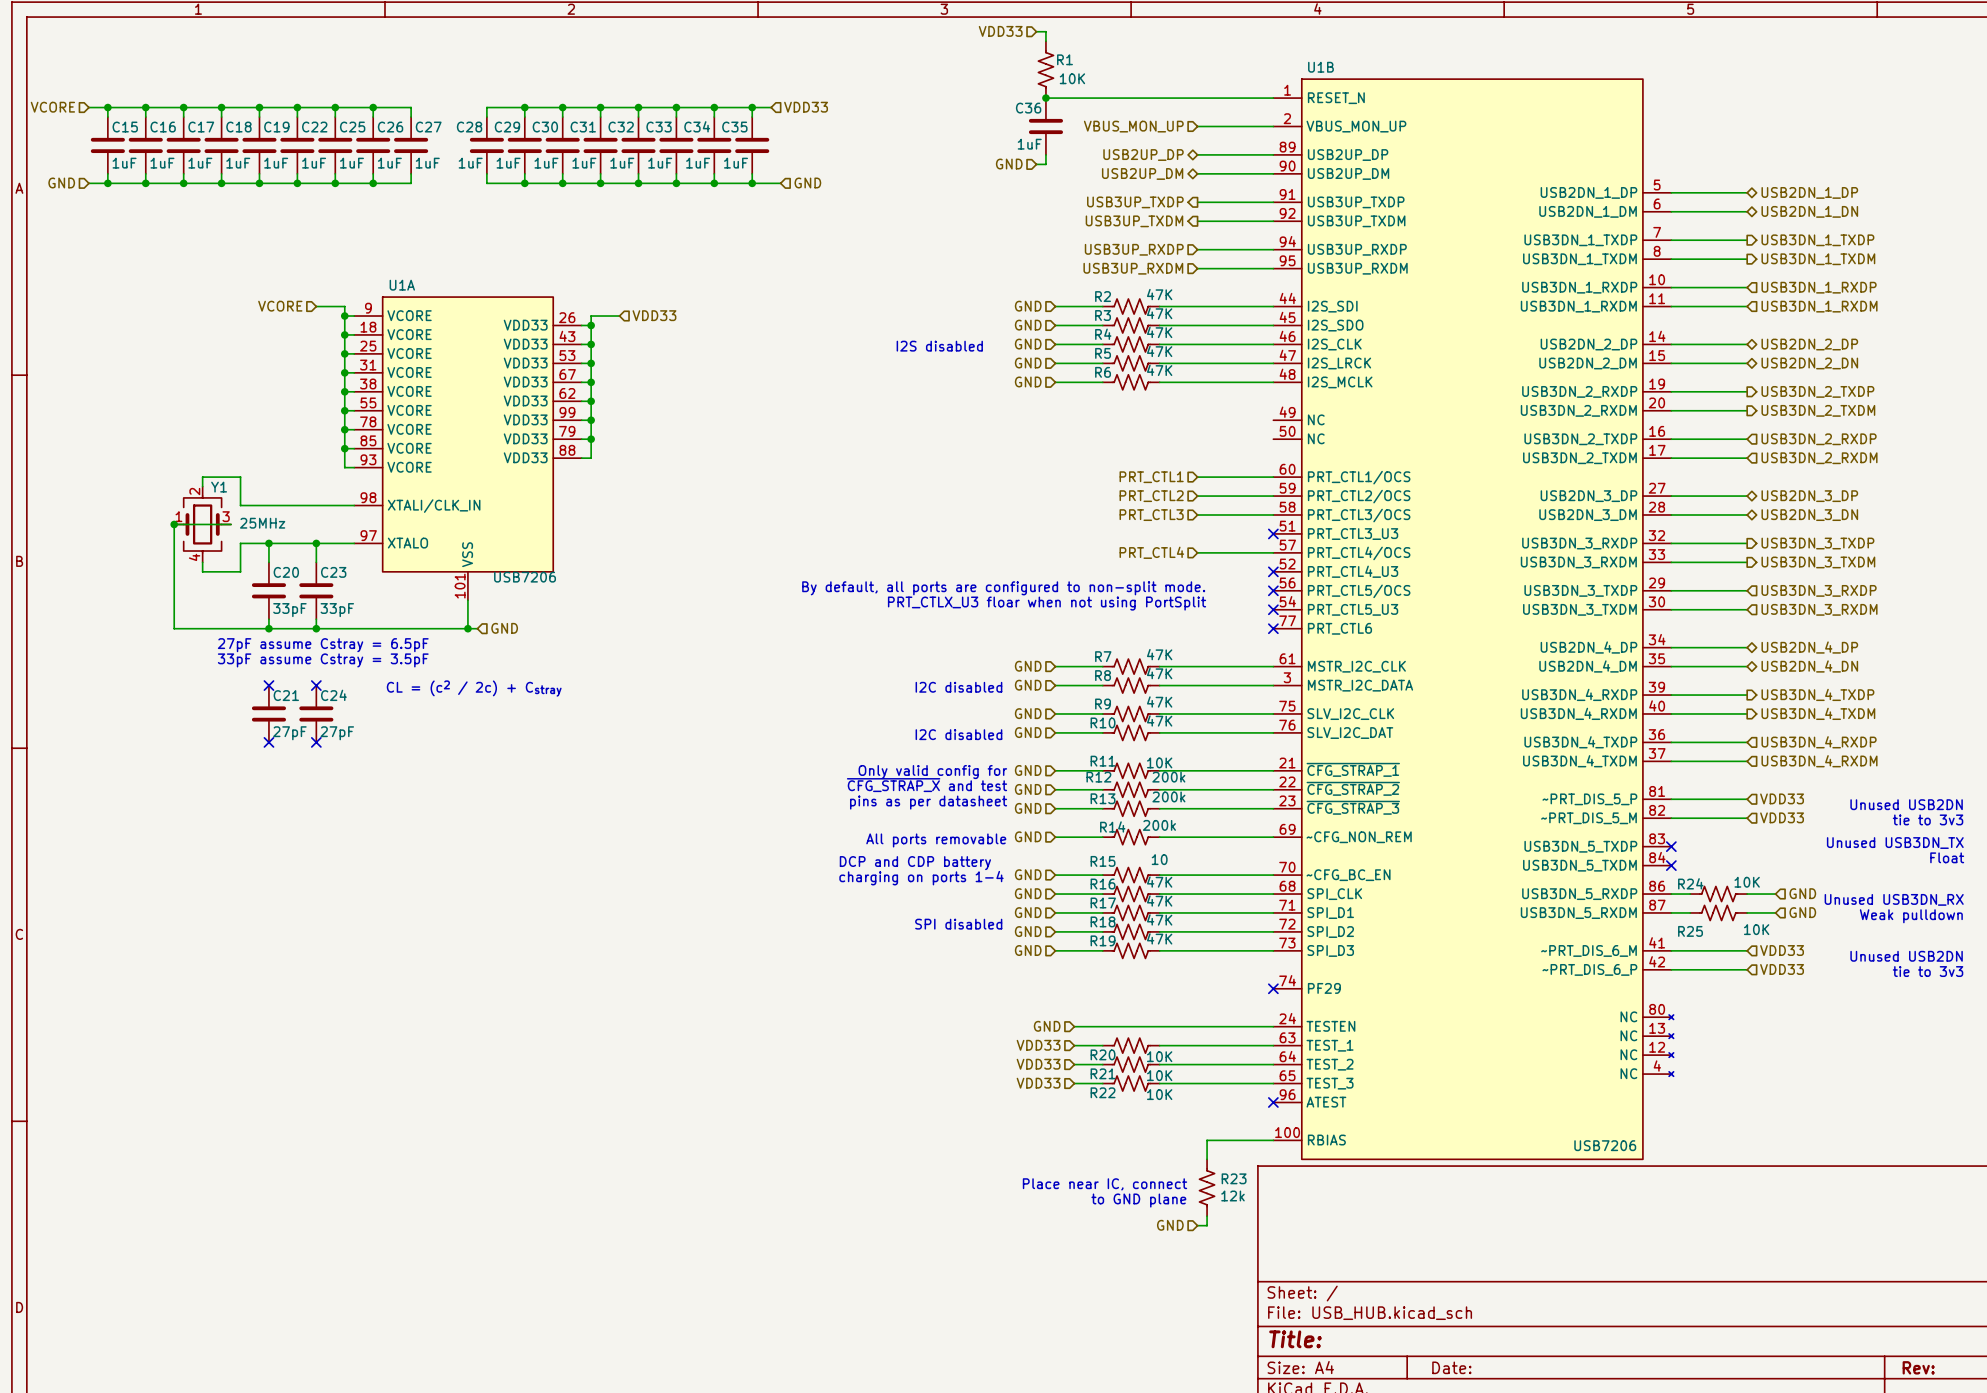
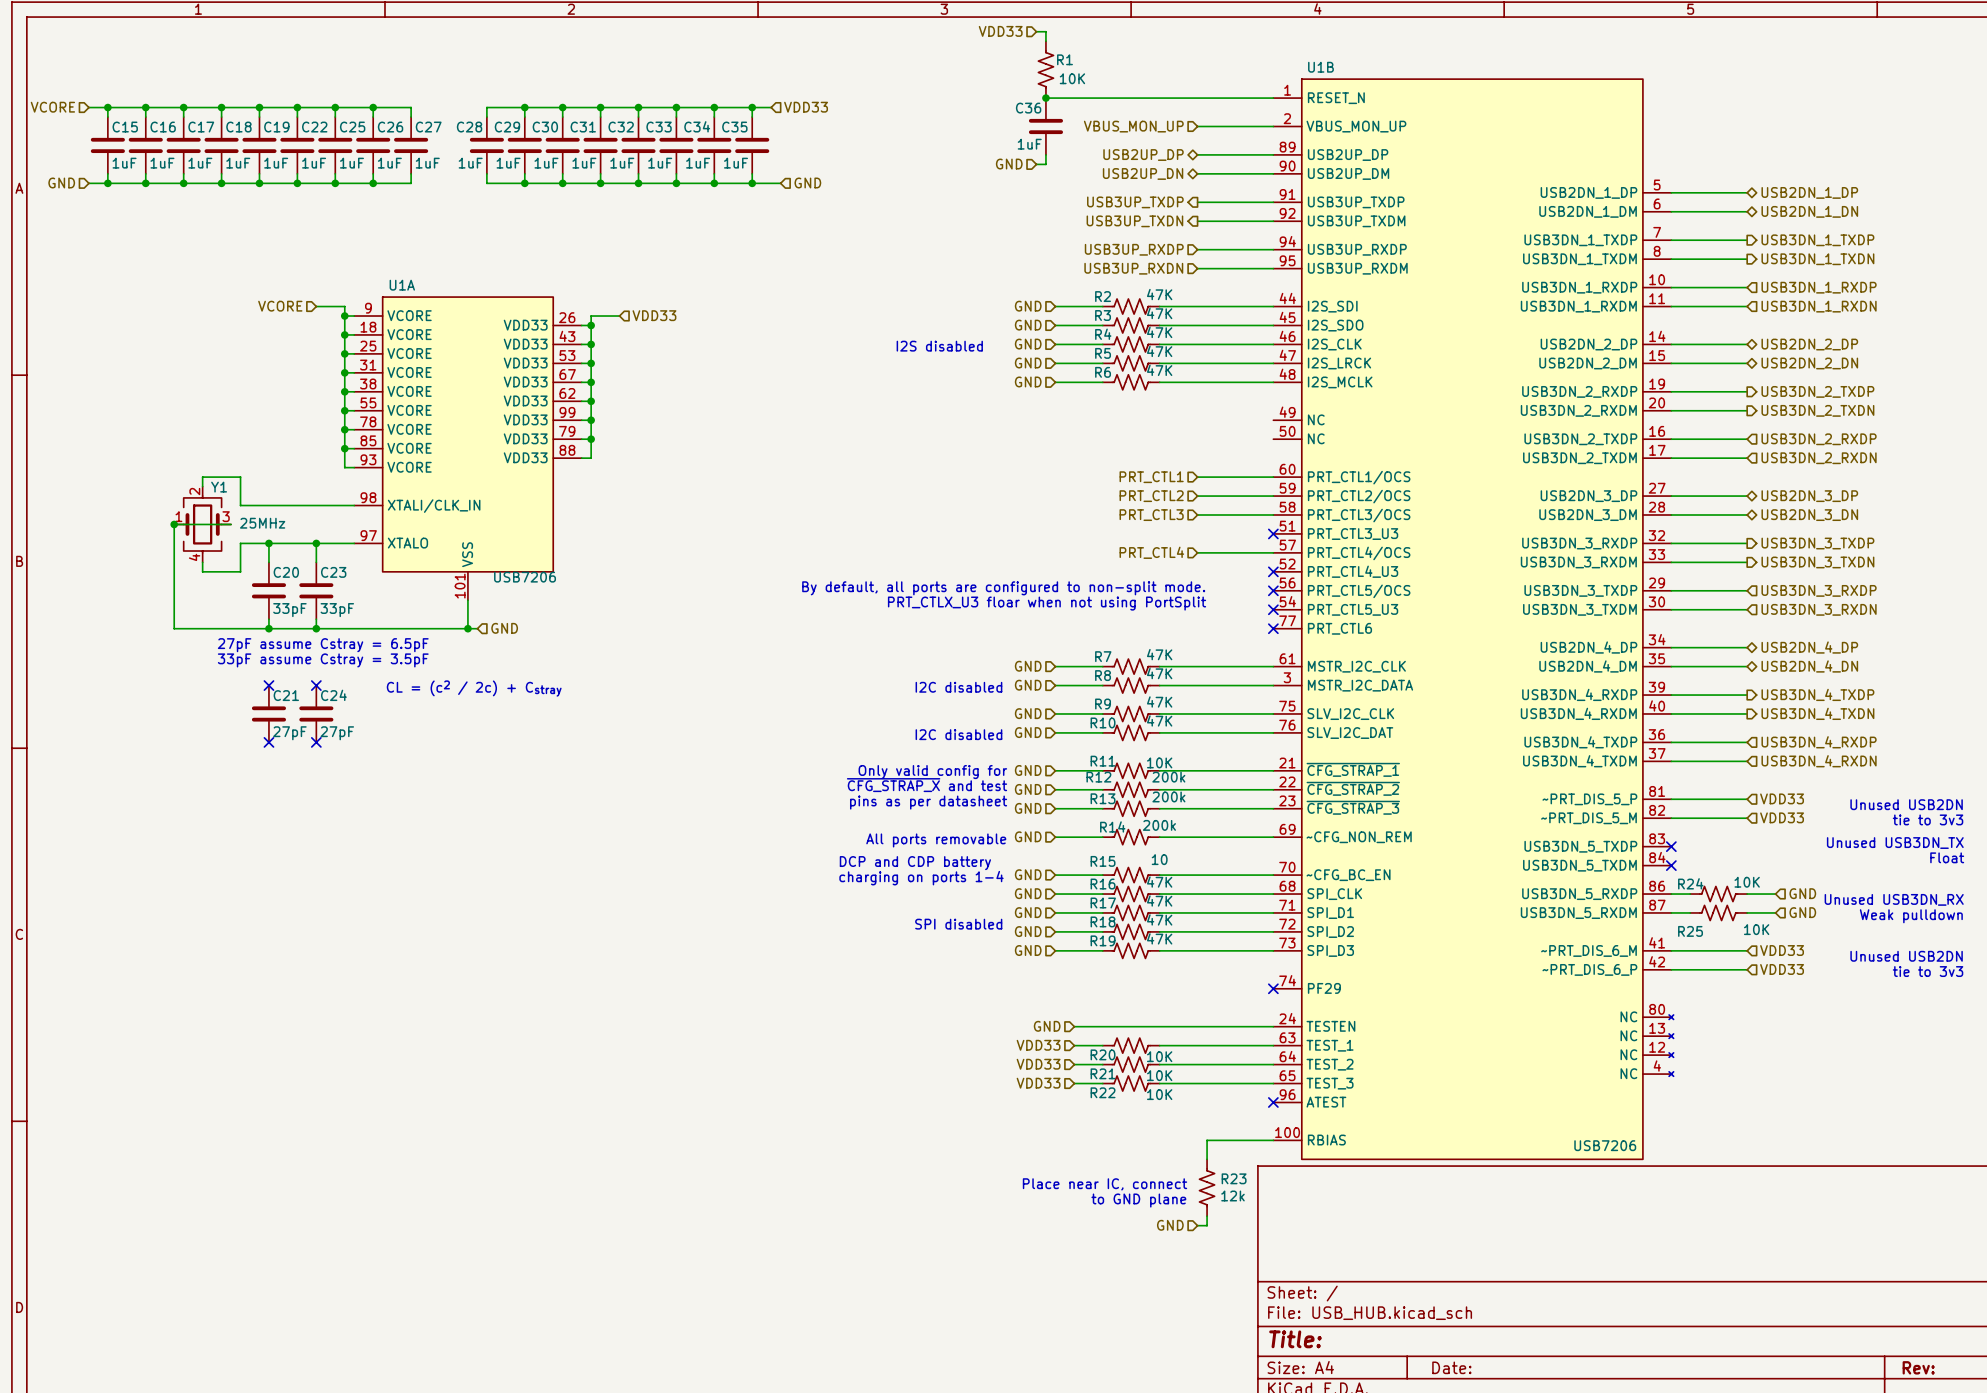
hierarchical label: USB2UP_DM (1142, 173) -> USB2UP_DN (1143, 173)
hierarchical label: USB3UP_TXDM (1134, 221) -> USB3UP_TXDN (1134, 221)
hierarchical label: USB3DN_1_TXDM (1818, 259) -> USB3DN_1_TXDN (1817, 259)
hierarchical label: USB3UP_RXDM (1133, 268) -> USB3UP_RXDN (1133, 268)
hierarchical label: USB3DN_1_RXDM (1819, 306) -> USB3DN_1_RXDN (1819, 306)
hierarchical label: USB3DN_2_TXDM (1818, 410) -> USB3DN_2_TXDN (1817, 410)
hierarchical label: USB3DN_2_RXDM (1819, 458) -> USB3DN_2_RXDN (1819, 458)
hierarchical label: USB3DN_3_TXDM (1818, 562) -> USB3DN_3_TXDN (1817, 562)
hierarchical label: USB3DN_3_RXDM (1819, 609) -> USB3DN_3_RXDN (1819, 609)
hierarchical label: USB3DN_4_TXDM (1818, 713) -> USB3DN_4_TXDN (1817, 713)
hierarchical label: USB3DN_4_RXDM (1819, 761) -> USB3DN_4_RXDN (1819, 761)

